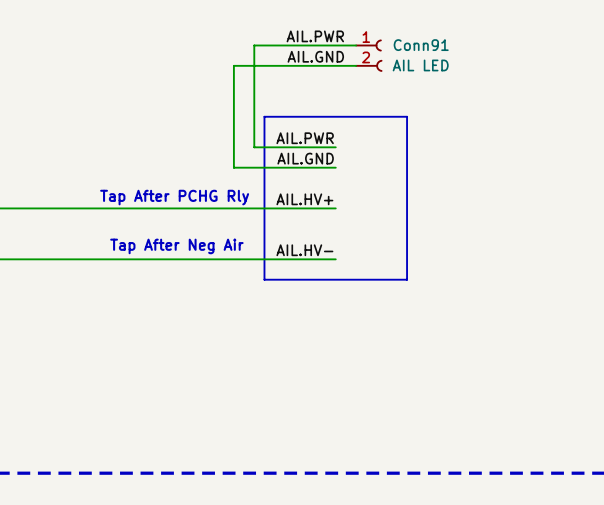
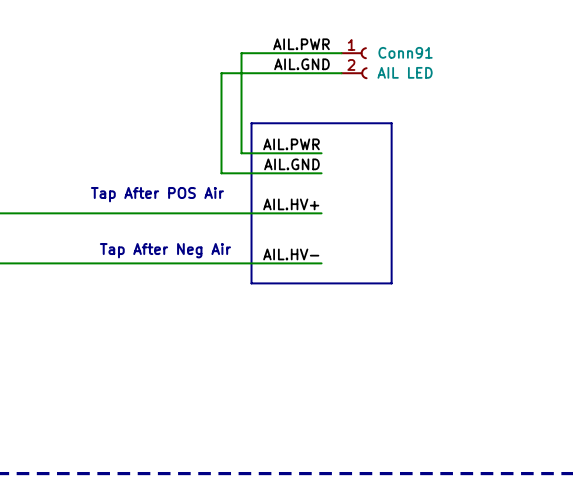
text: Tap After PCHG Rly (174, 197) -> Tap After POS Air (157, 194)

